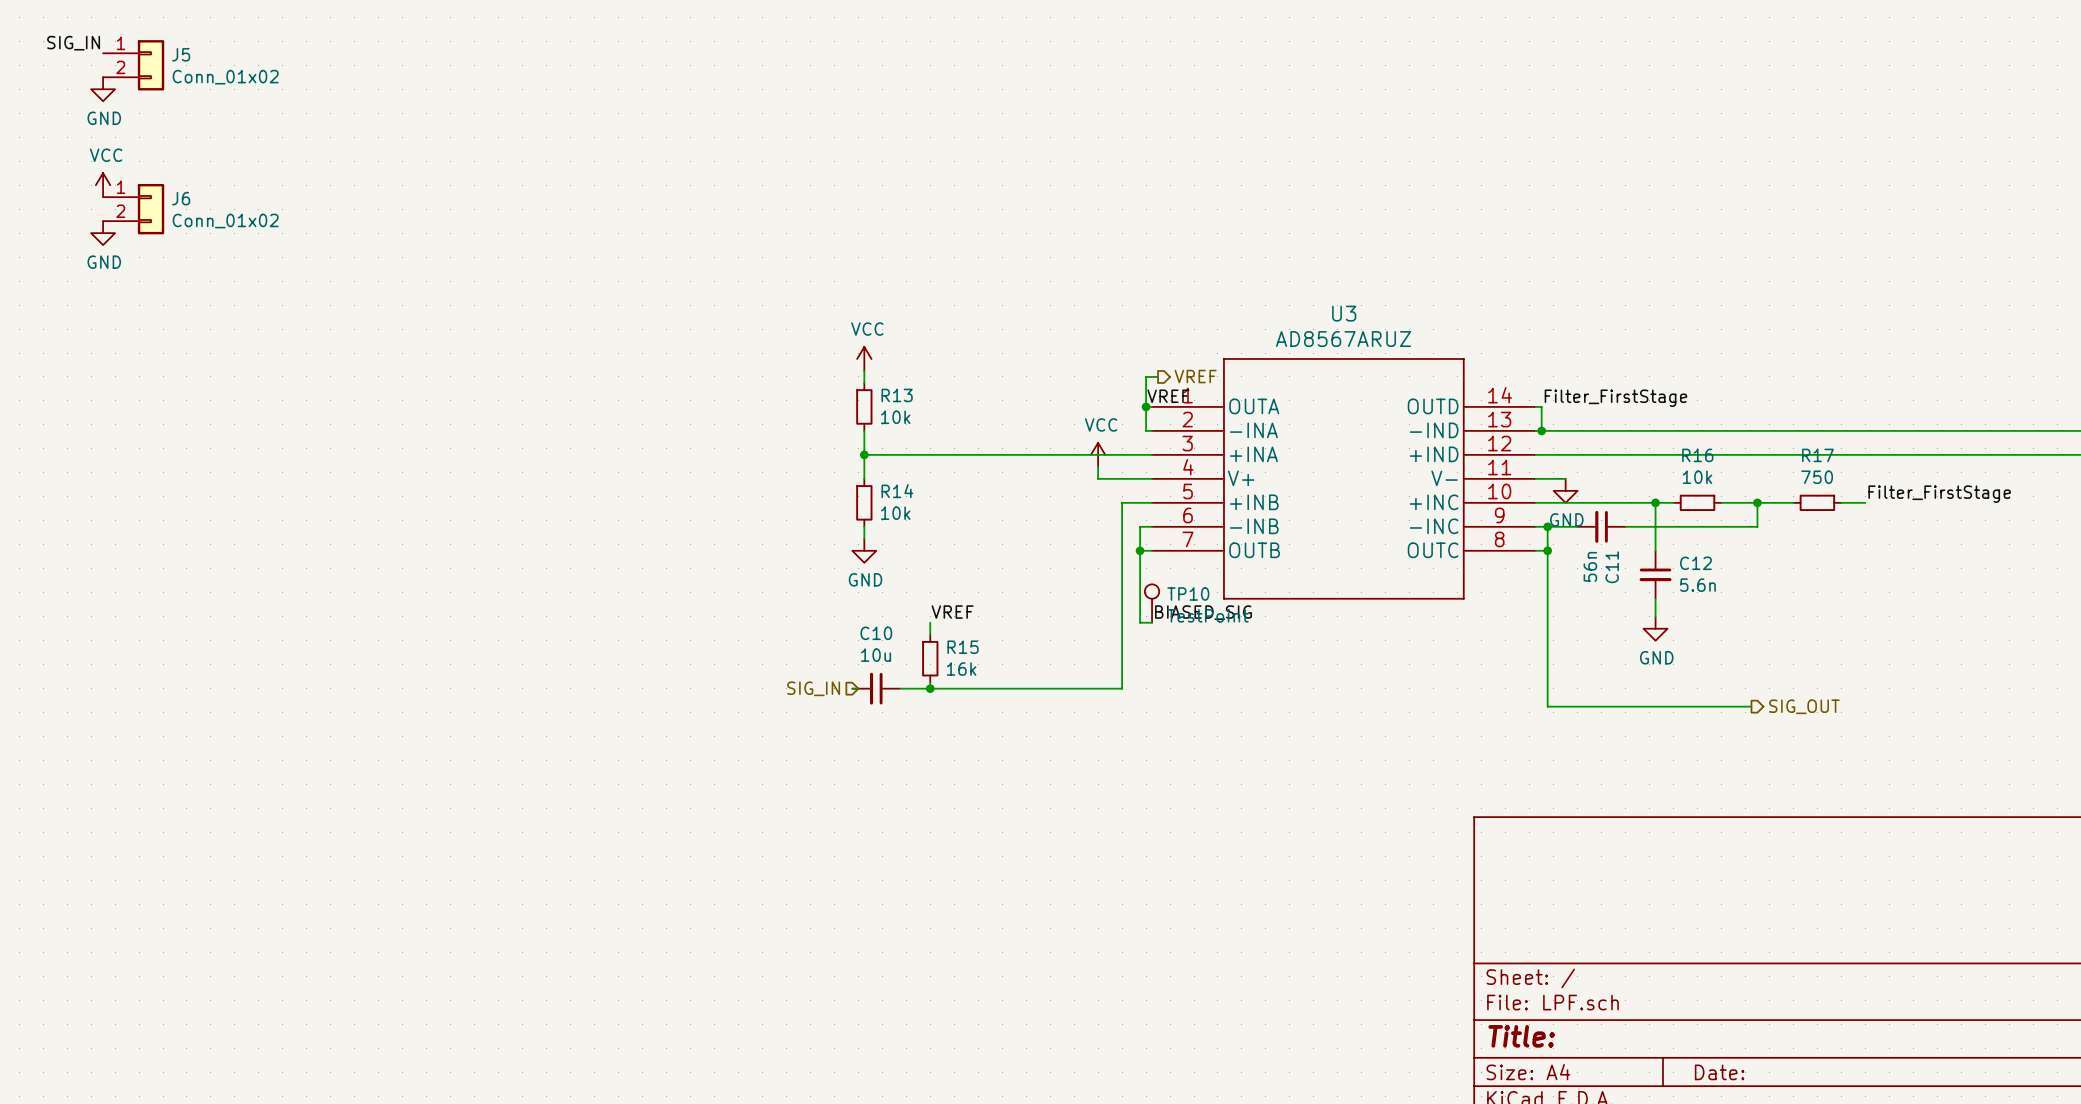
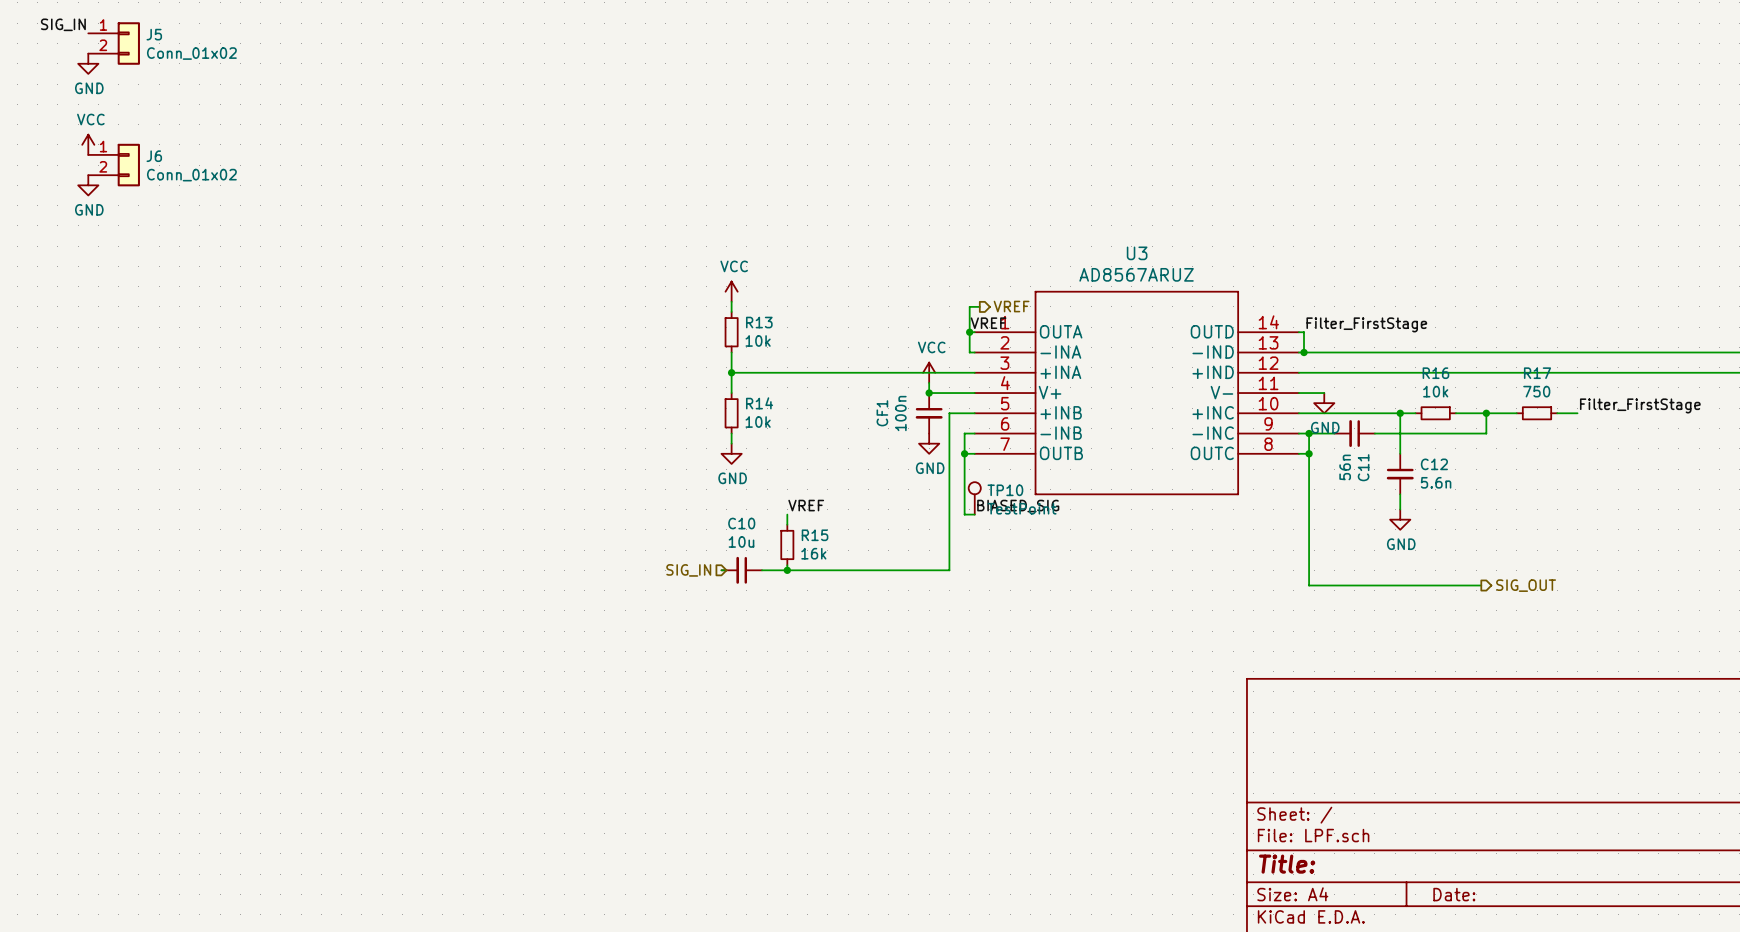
junction: none -> (929, 393)
CF1: none -> 100n (929, 413)
power symbol: none -> GND (929, 443)

